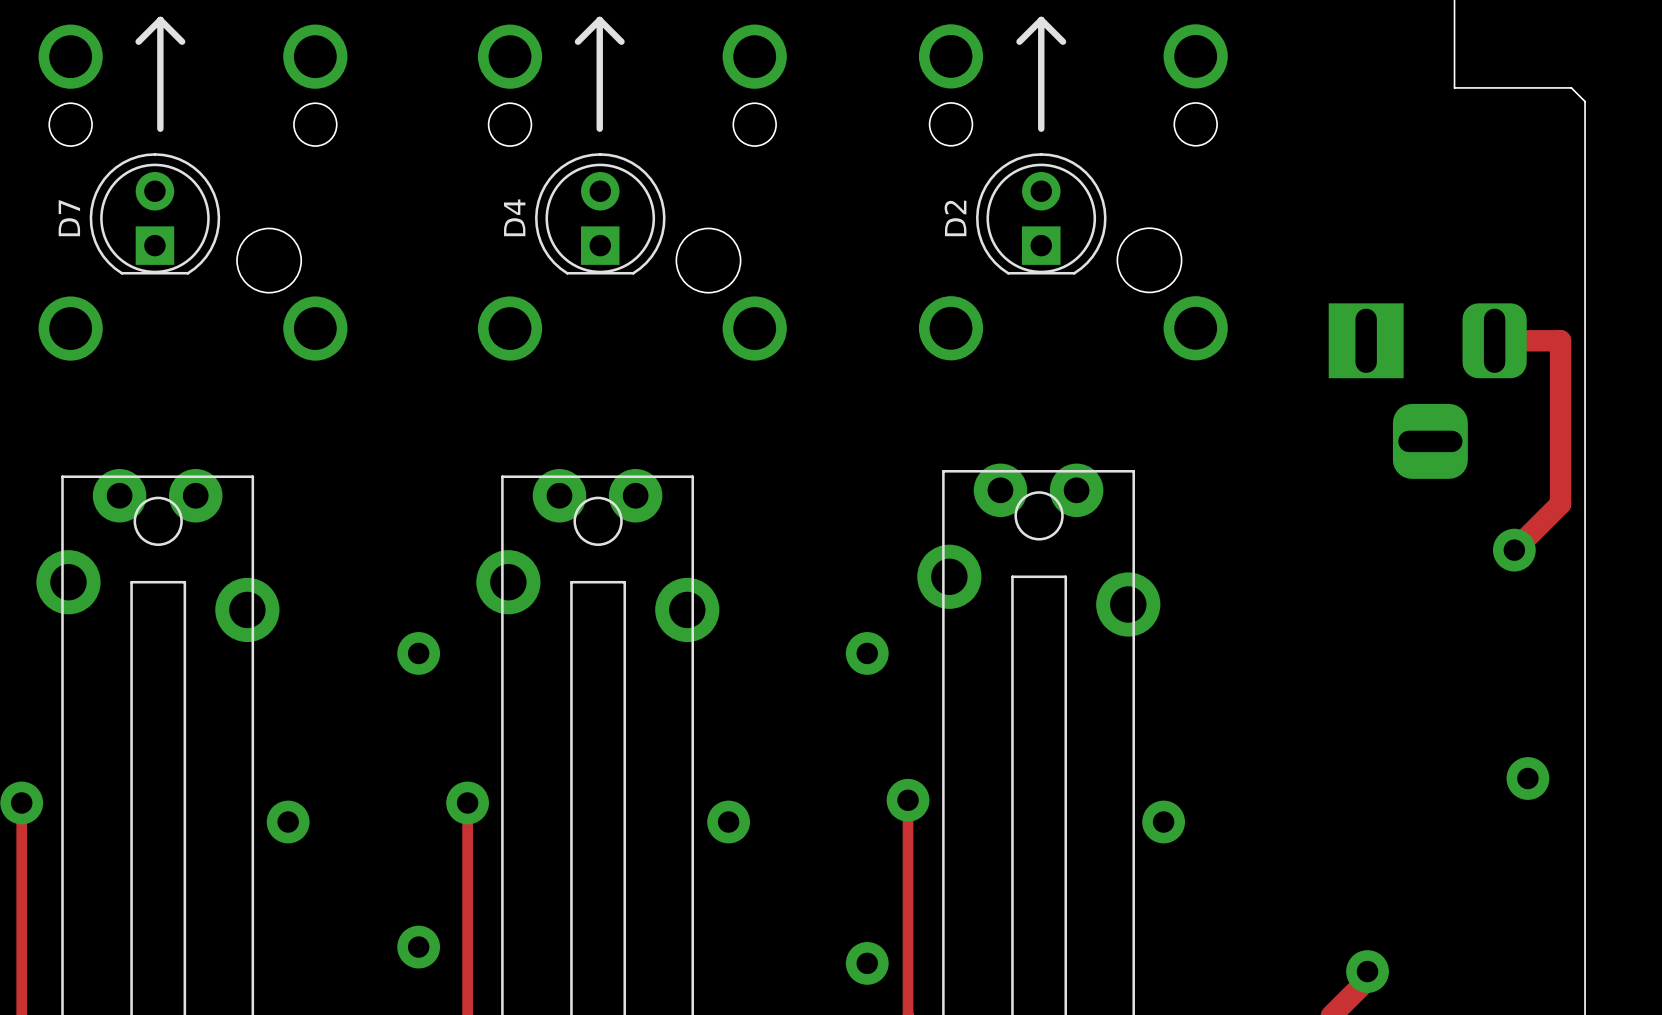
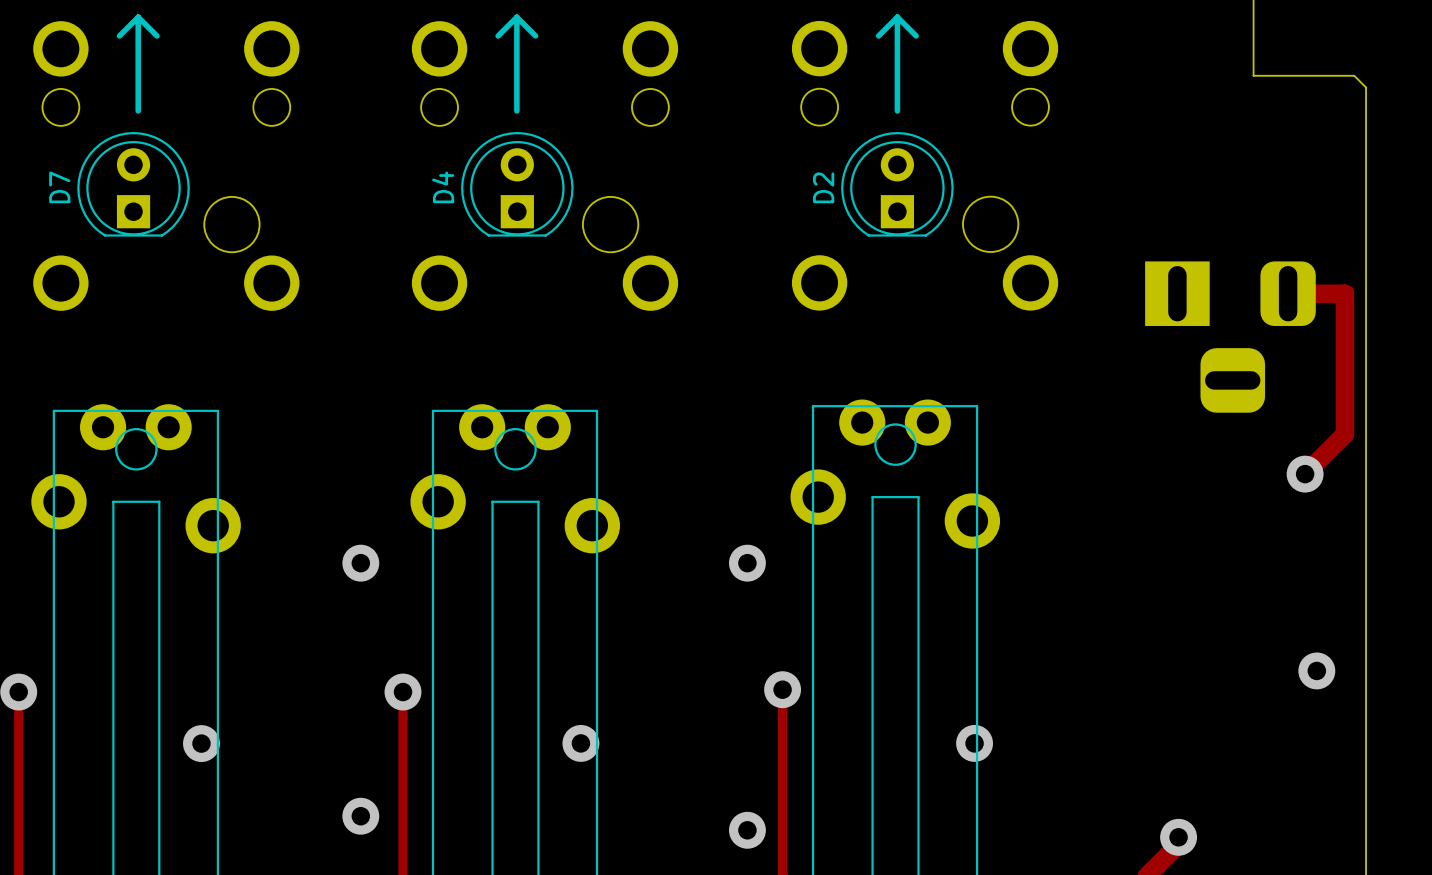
via position: (288, 822) -> (201, 743)
via position: (728, 822) -> (580, 743)
via position: (1163, 822) -> (974, 743)

